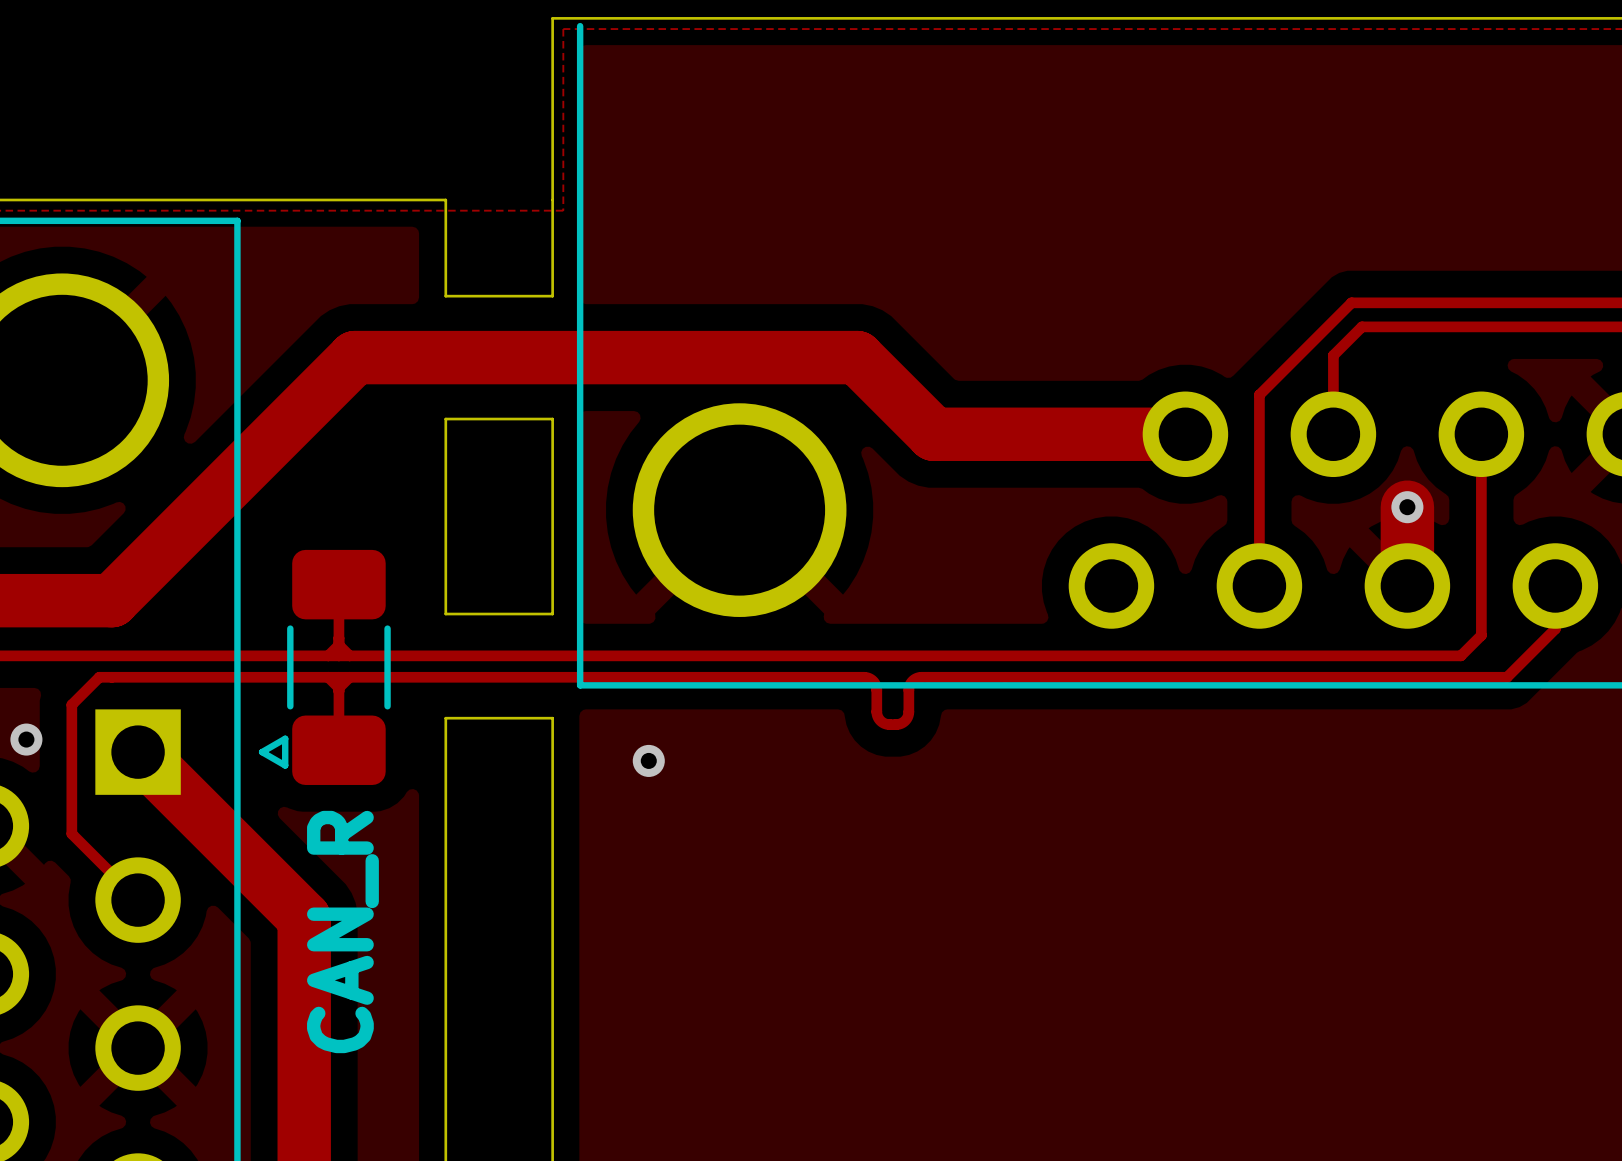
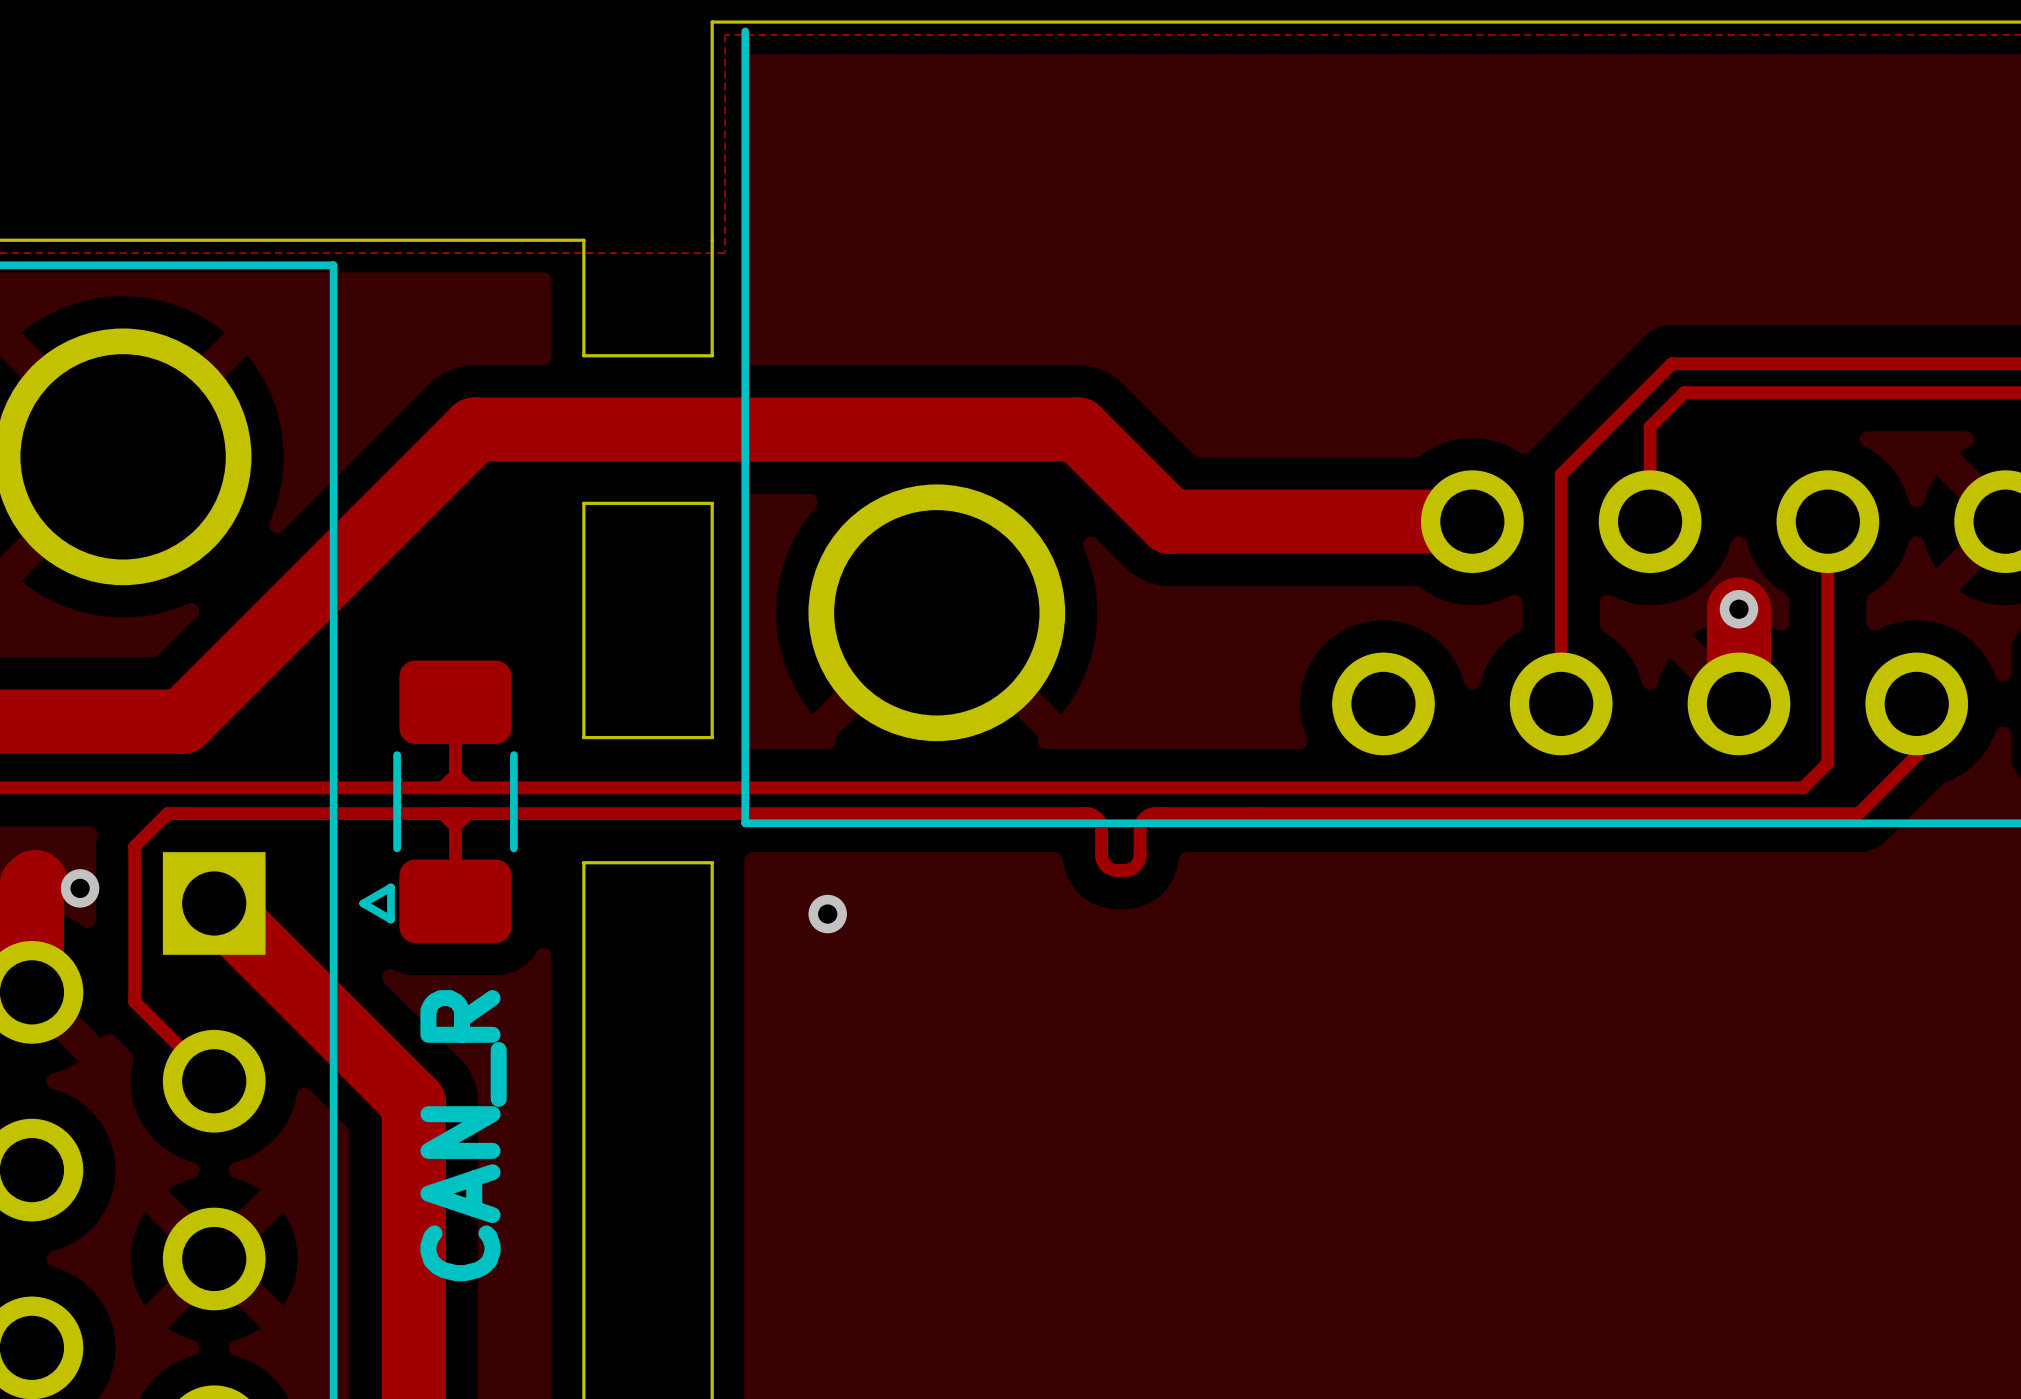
text position: CAN_R (342, 932) -> CAN_R (463, 1135)

